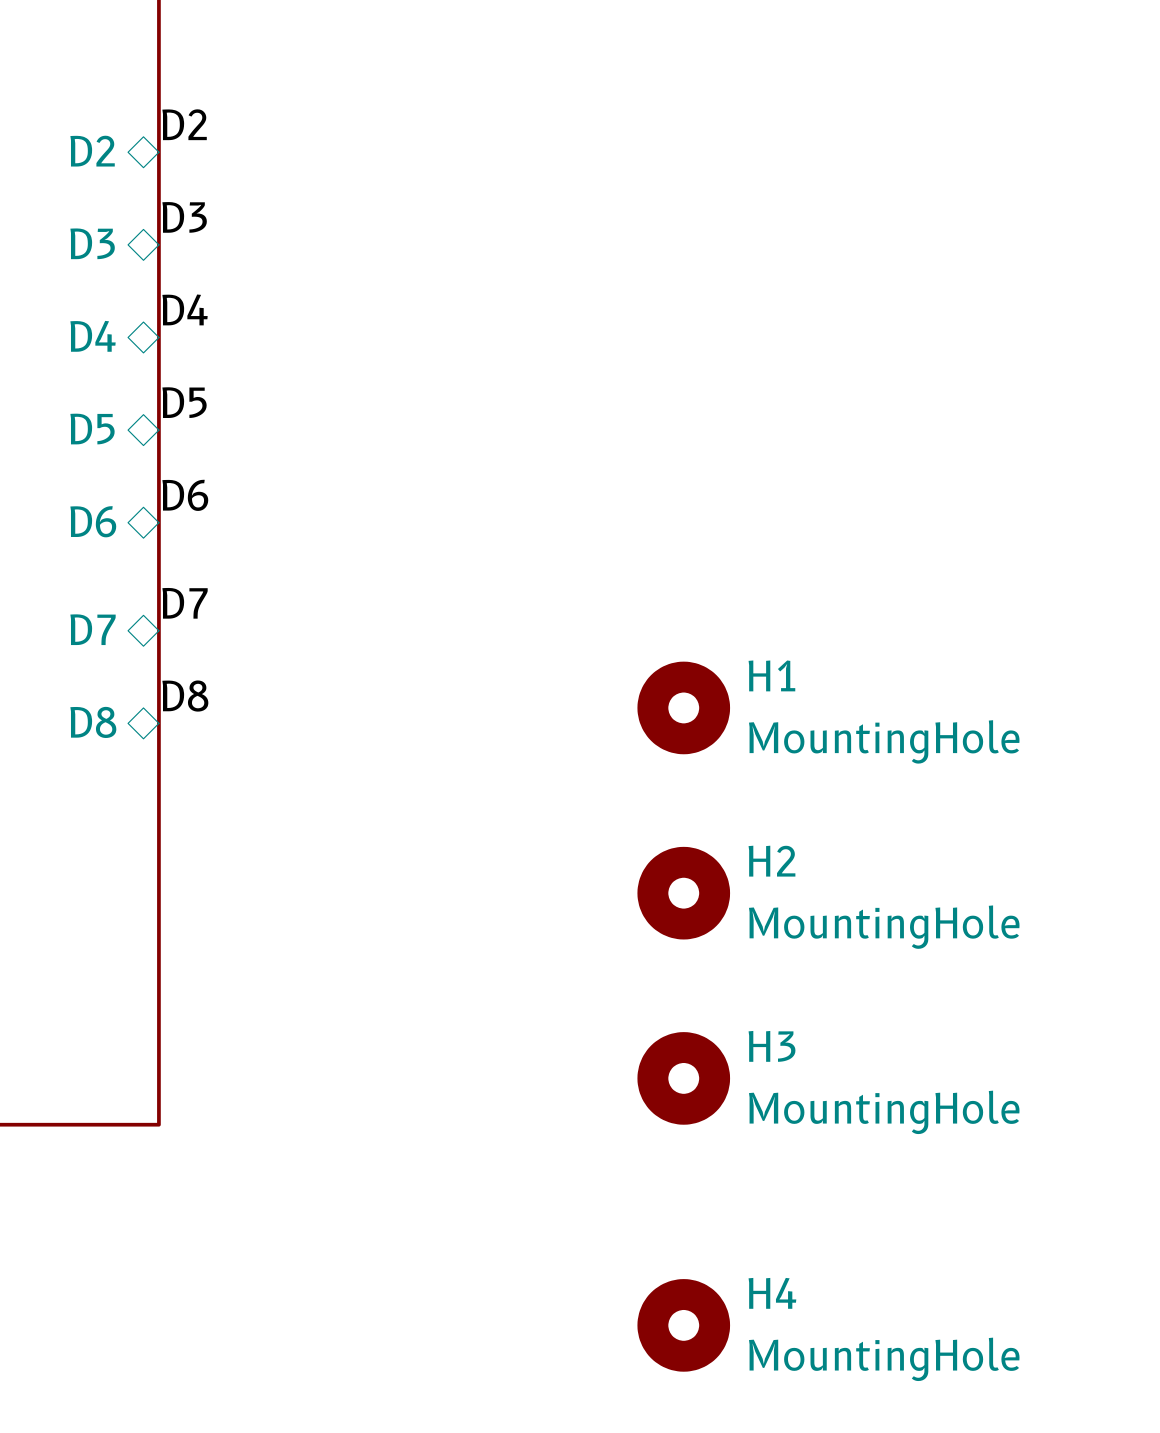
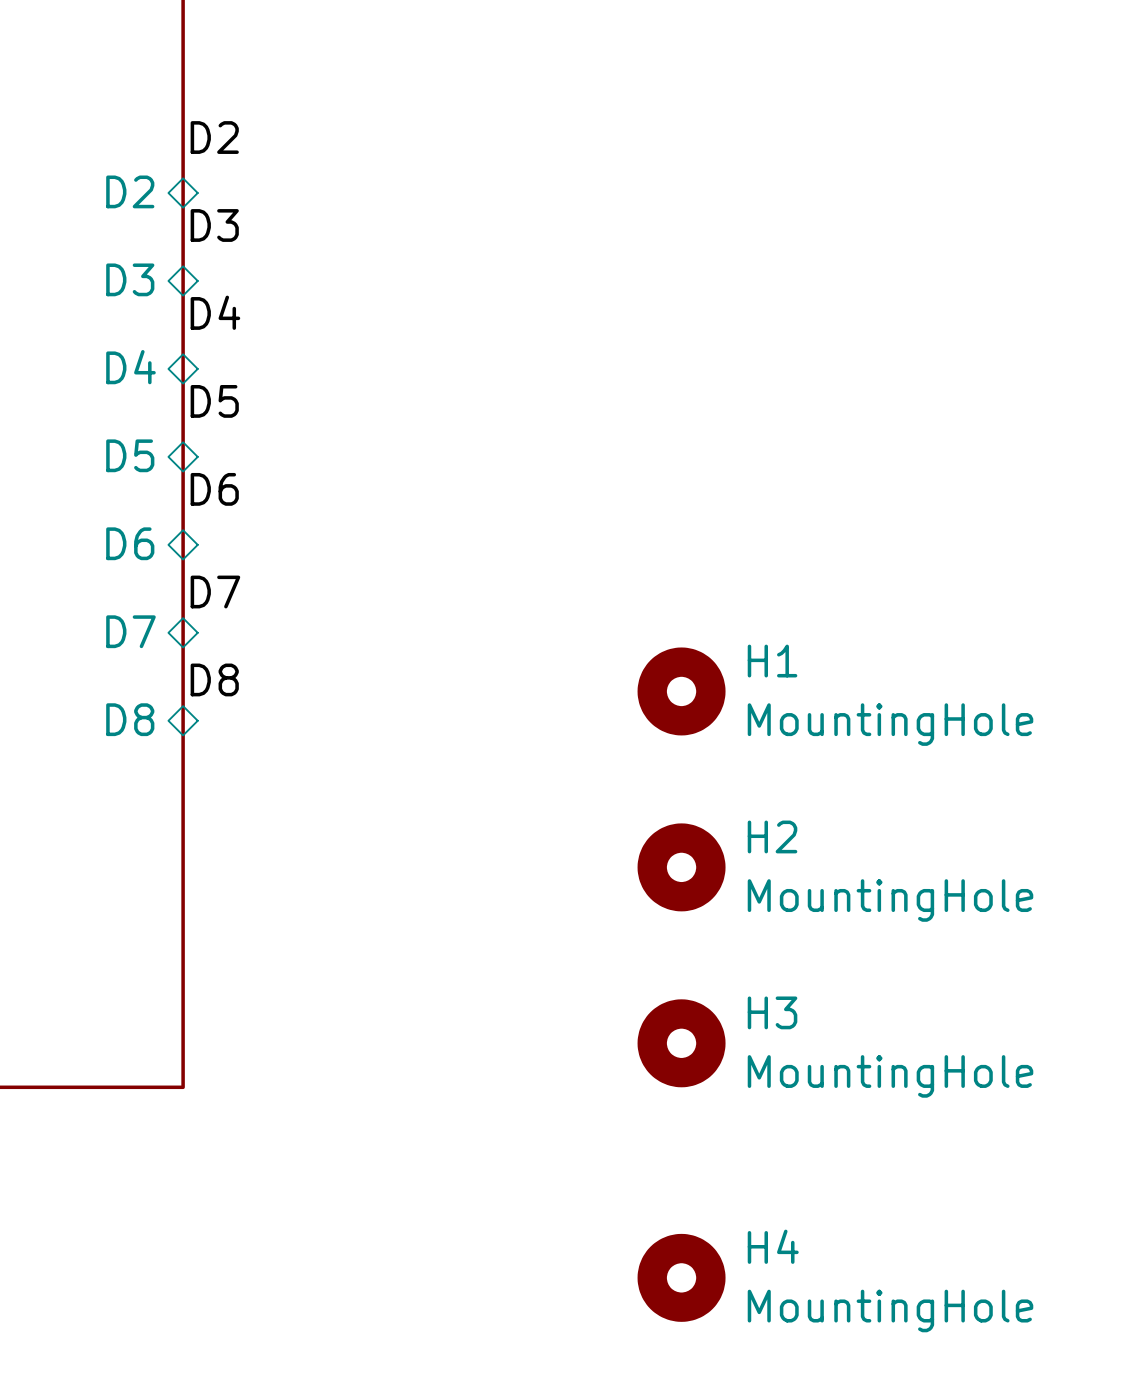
sheet pin position: D2 (92, 151) -> D2 (130, 191)
sheet pin position: D3 (92, 243) -> D3 (130, 279)
sheet pin position: D4 (93, 336) -> D4 (130, 367)
sheet pin position: D5 (92, 429) -> D5 (130, 455)
sheet pin position: D6 (93, 521) -> D6 (130, 543)
sheet pin position: D7 (93, 629) -> D7 (130, 631)
sheet pin position: D8 (93, 722) -> D8 (130, 719)

